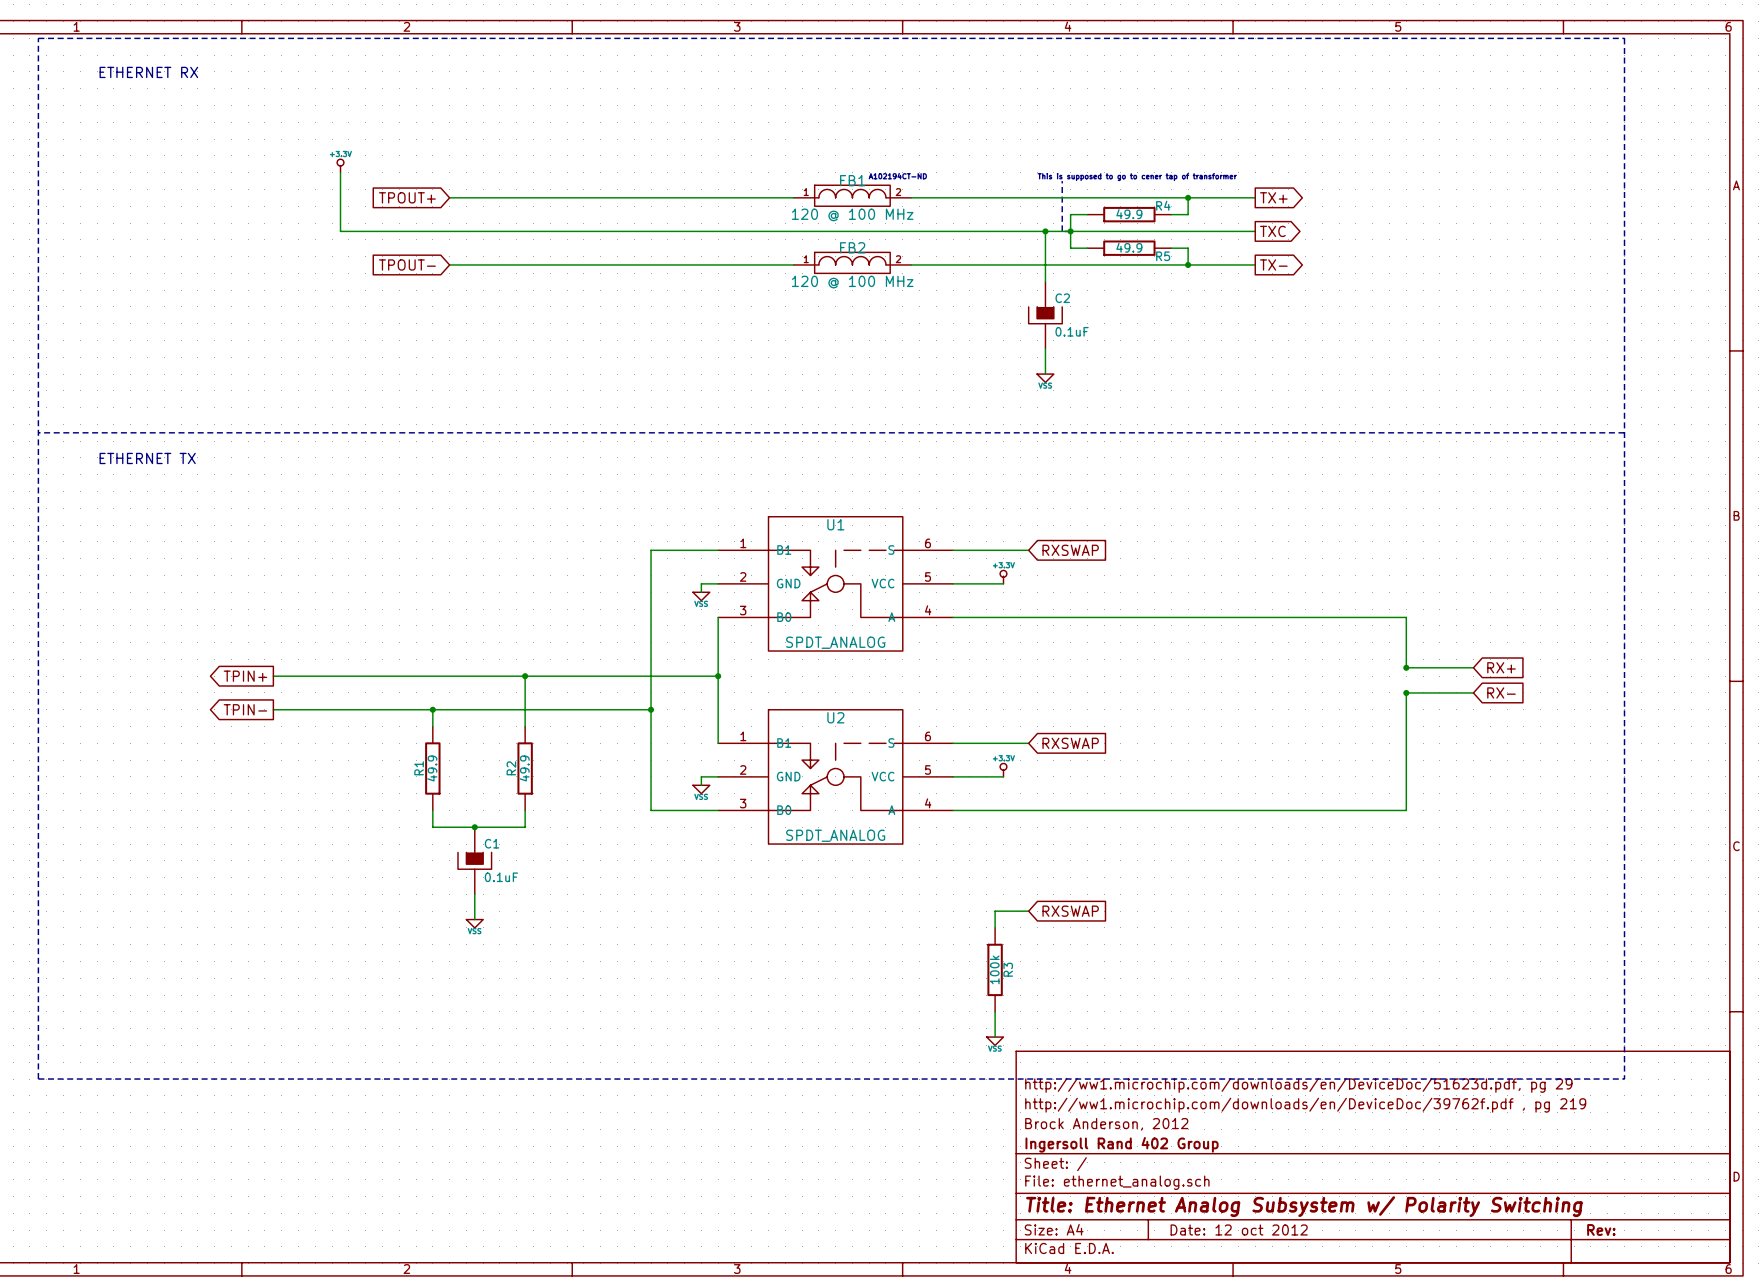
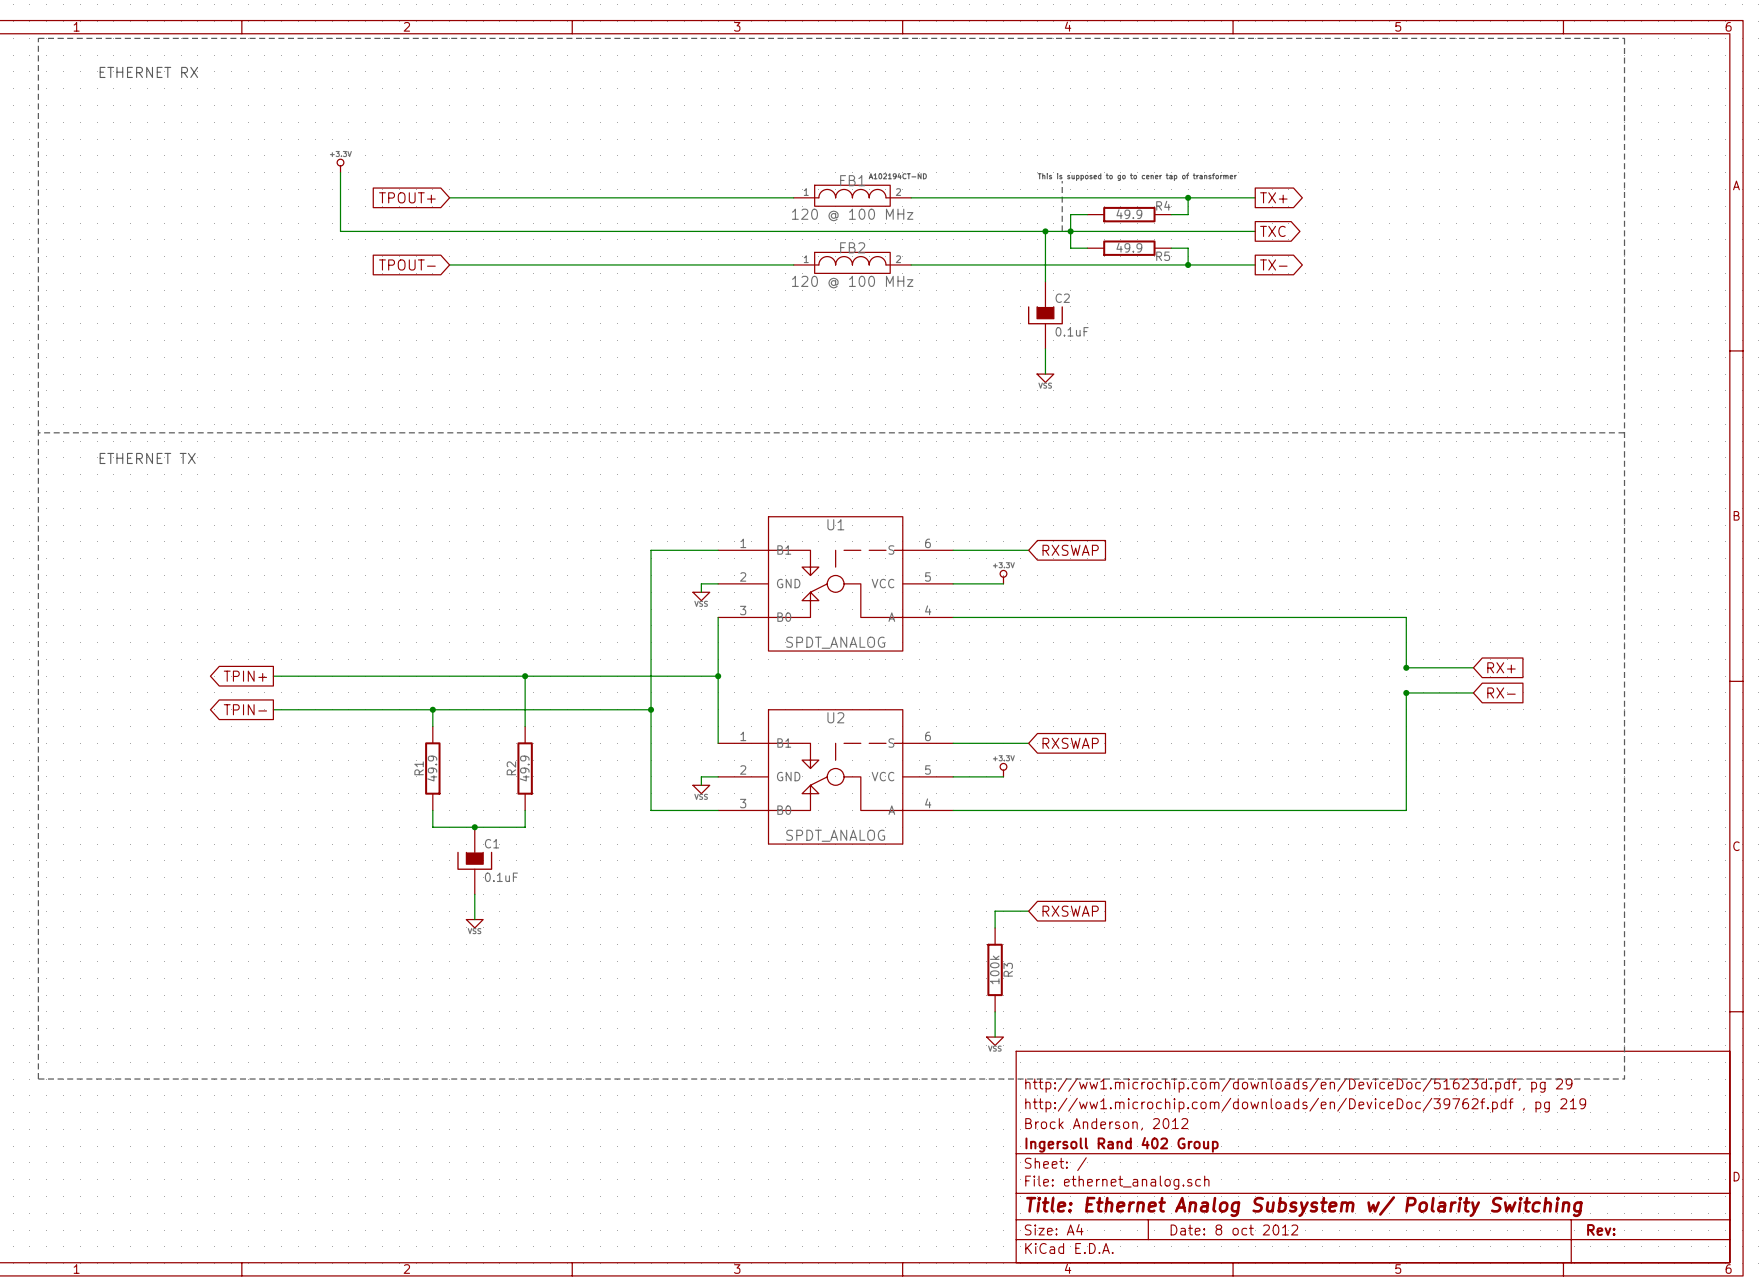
title block: Date: 12 oct 2012 (1239, 1229) -> Date: 8 oct 2012 (1234, 1229)

